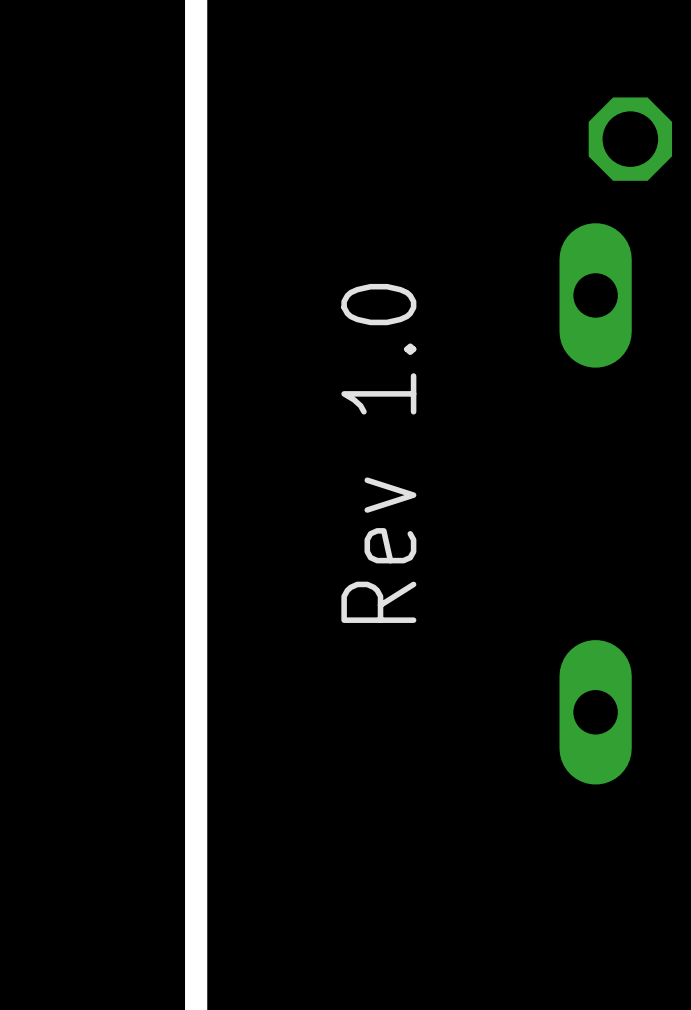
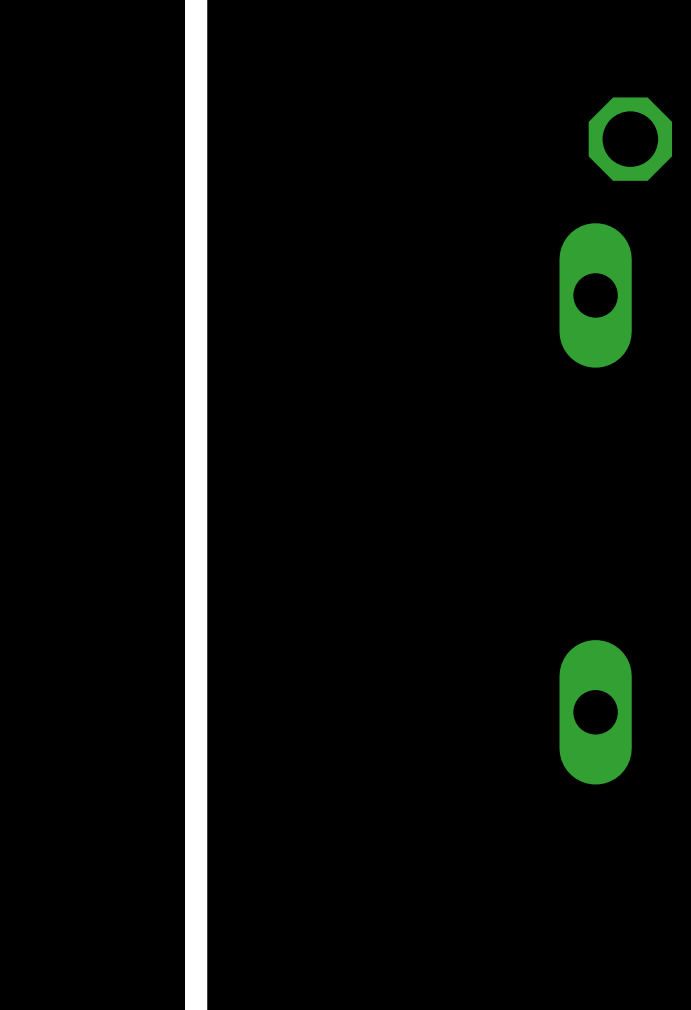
text: Rev 1.0 (378, 453) -> none

